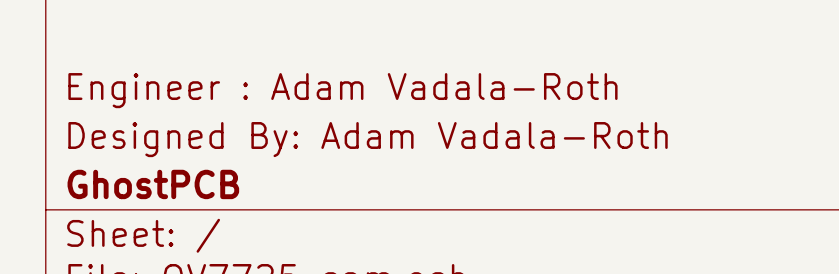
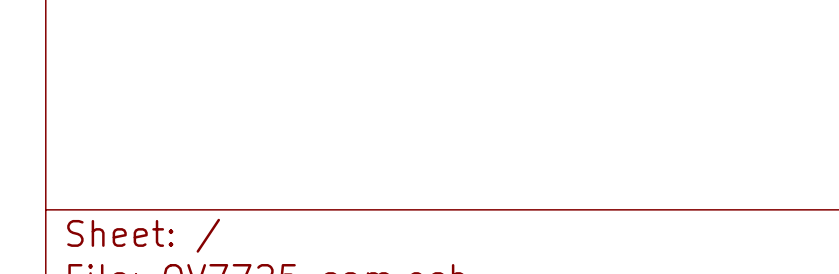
title block: Engineer : Adam Vadala-Roth (342, 90) -> none
title block: Designed By: Adam Vadala-Roth (368, 139) -> none
title block: GhostPCB (153, 184) -> none

